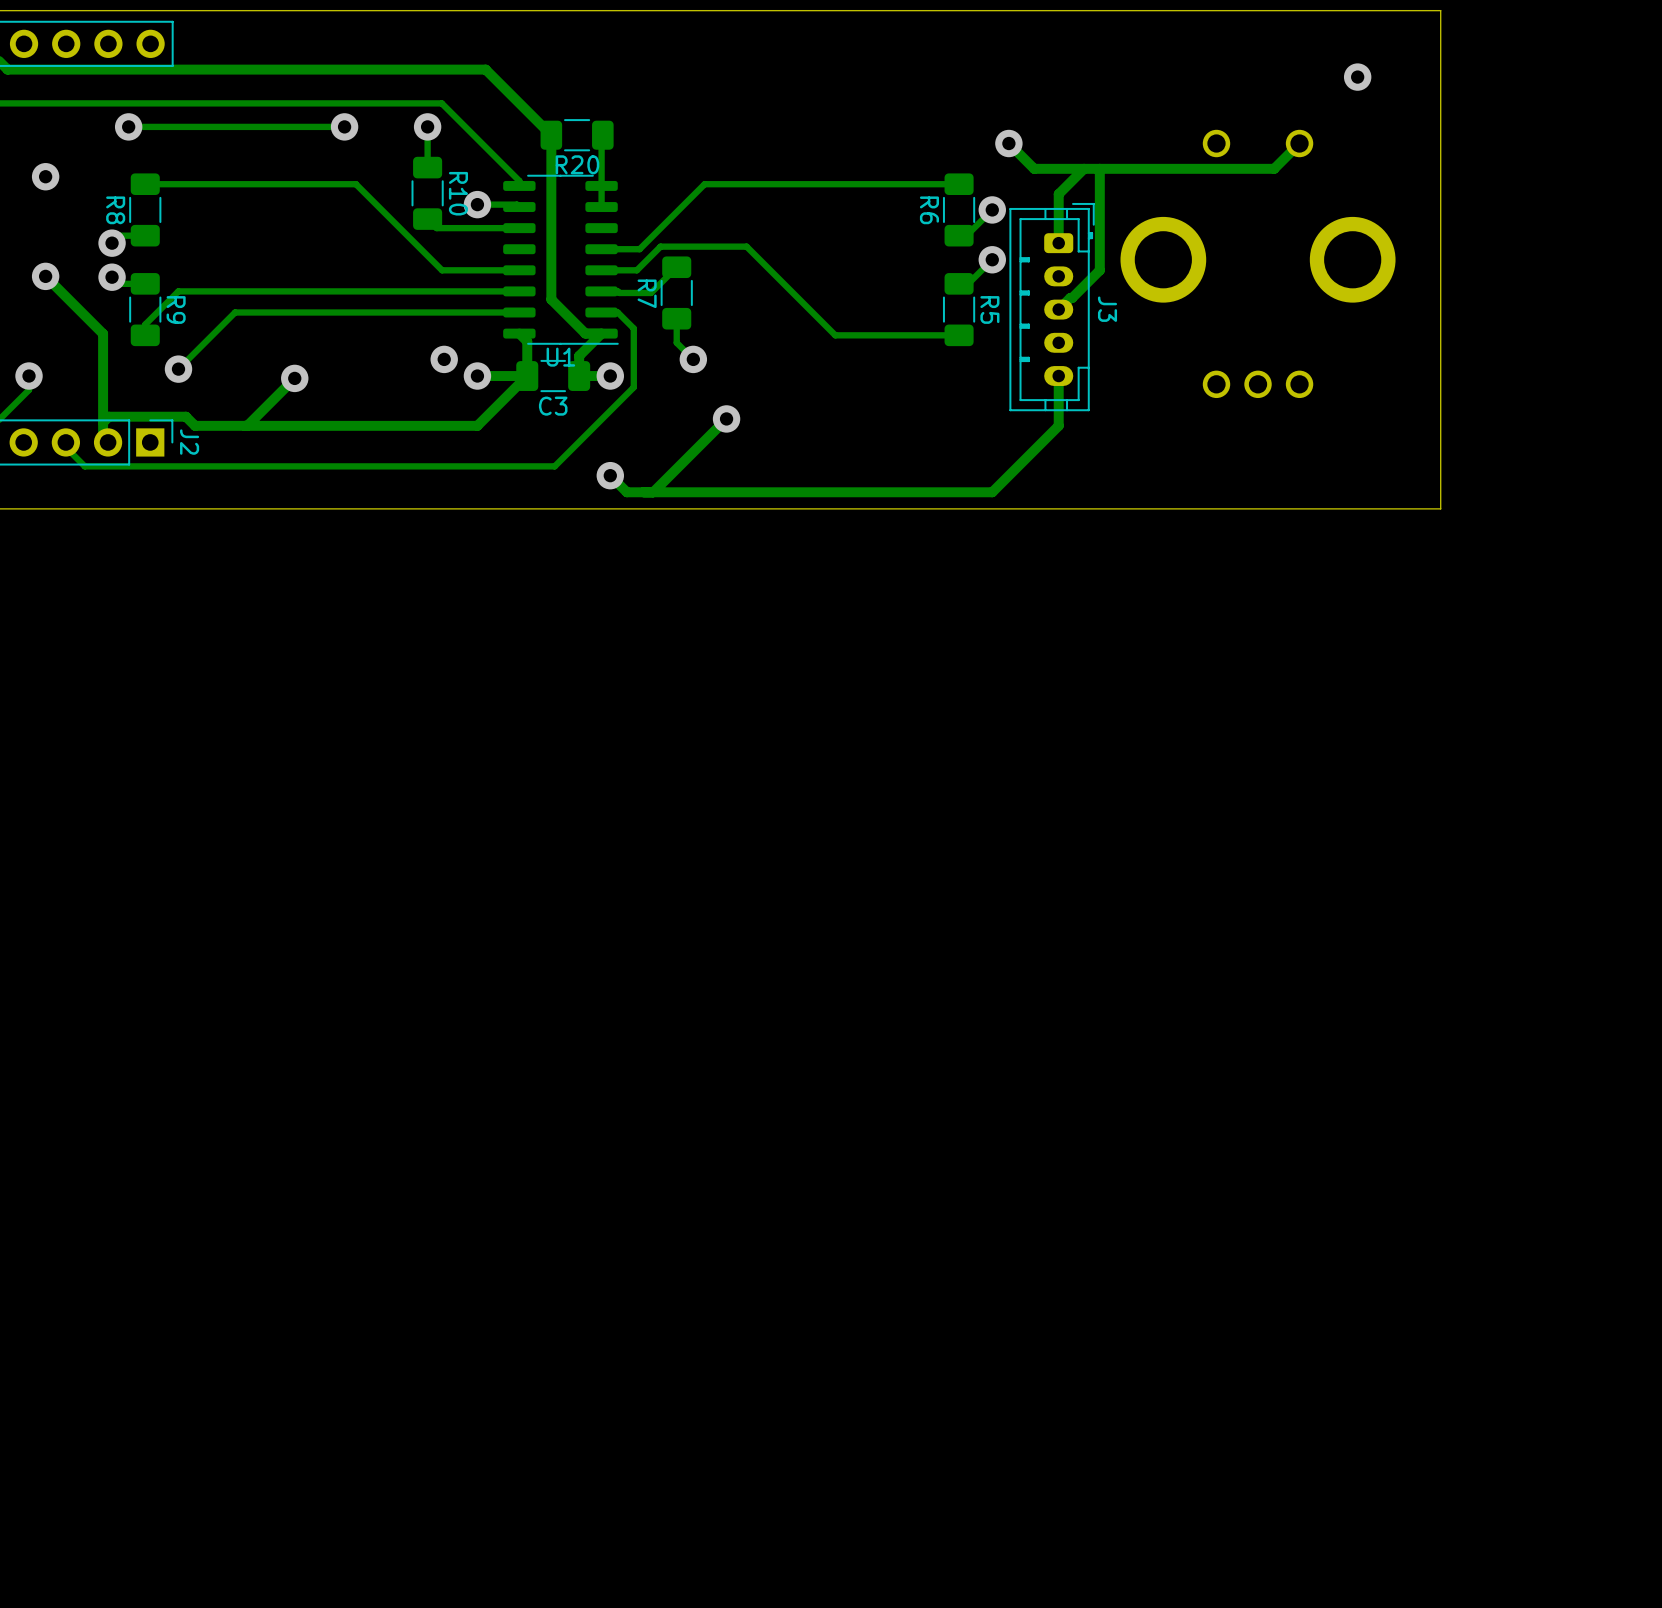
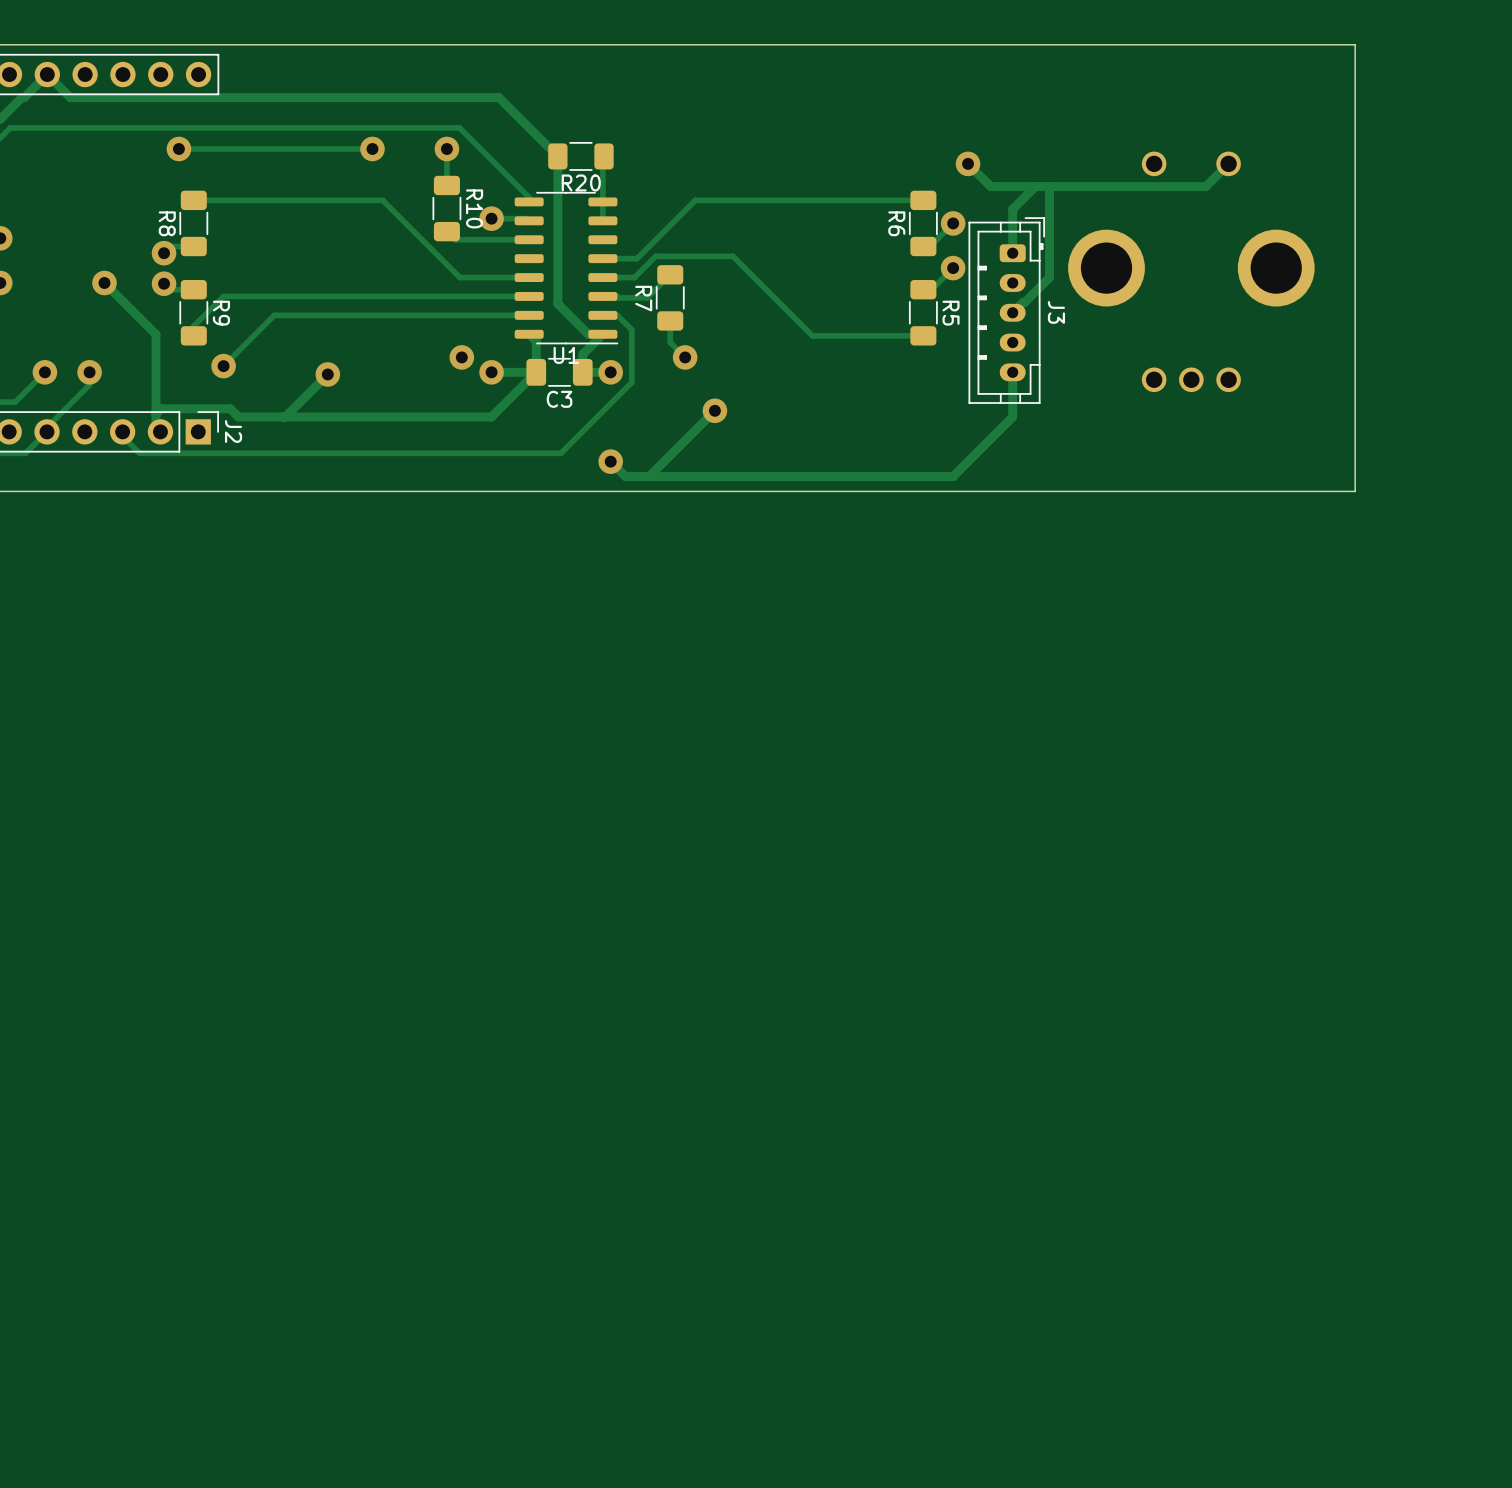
via: (1357, 77) -> none
via: (45, 176) -> none

